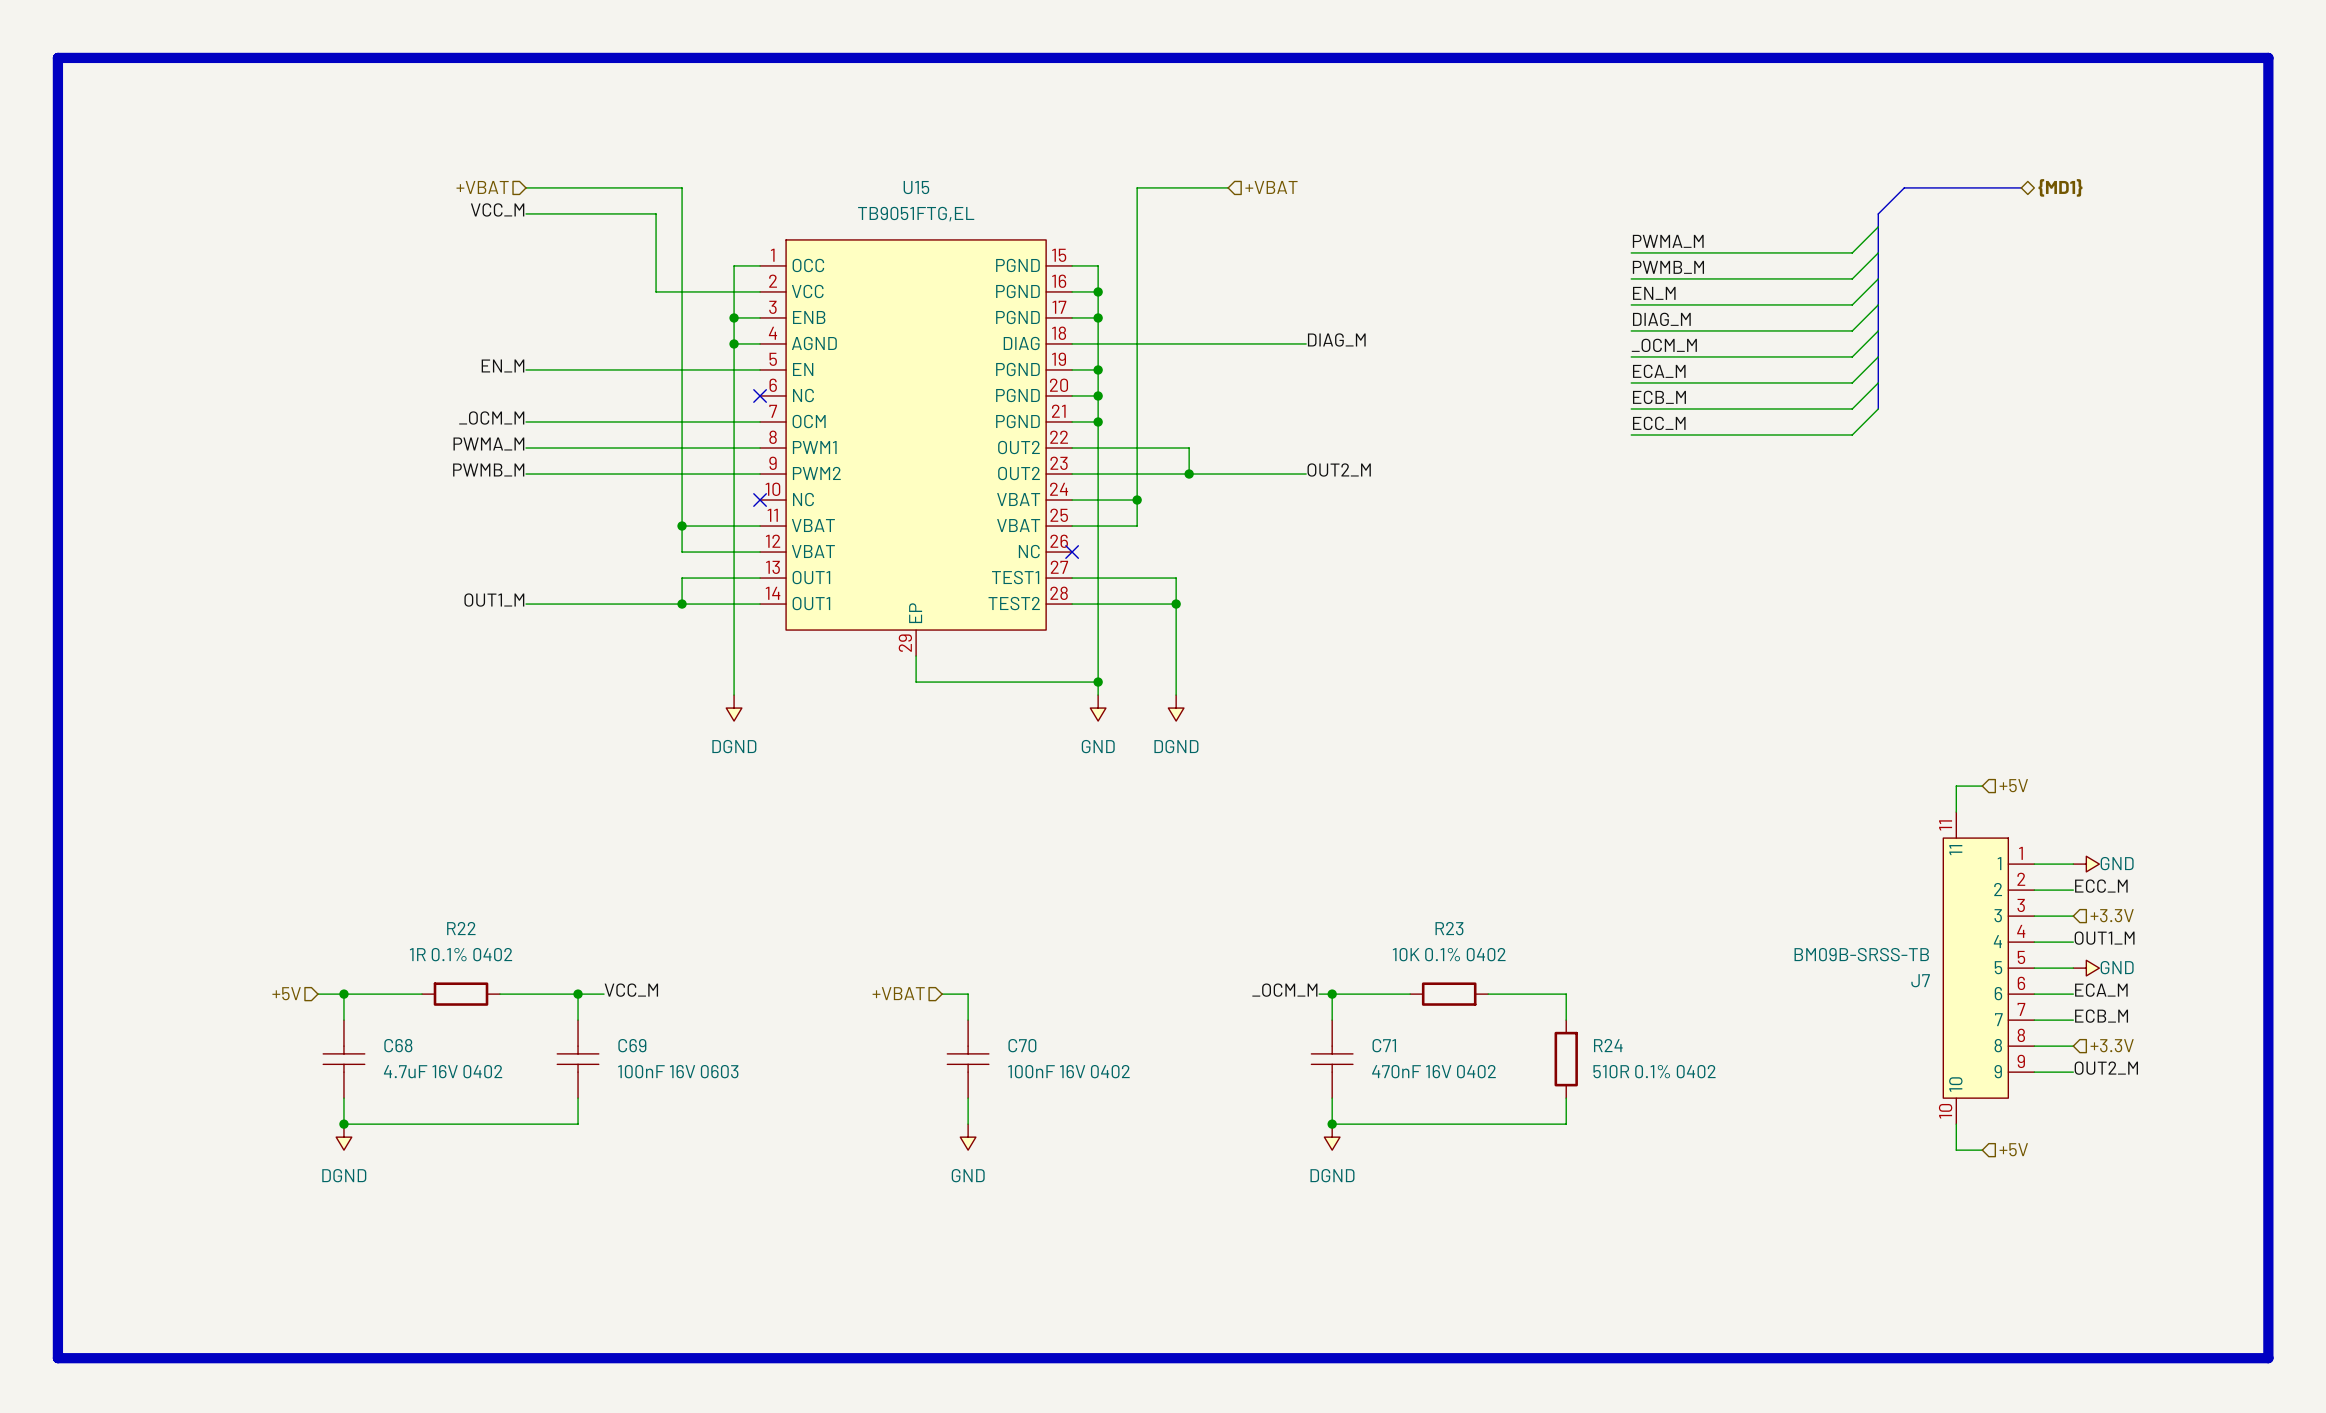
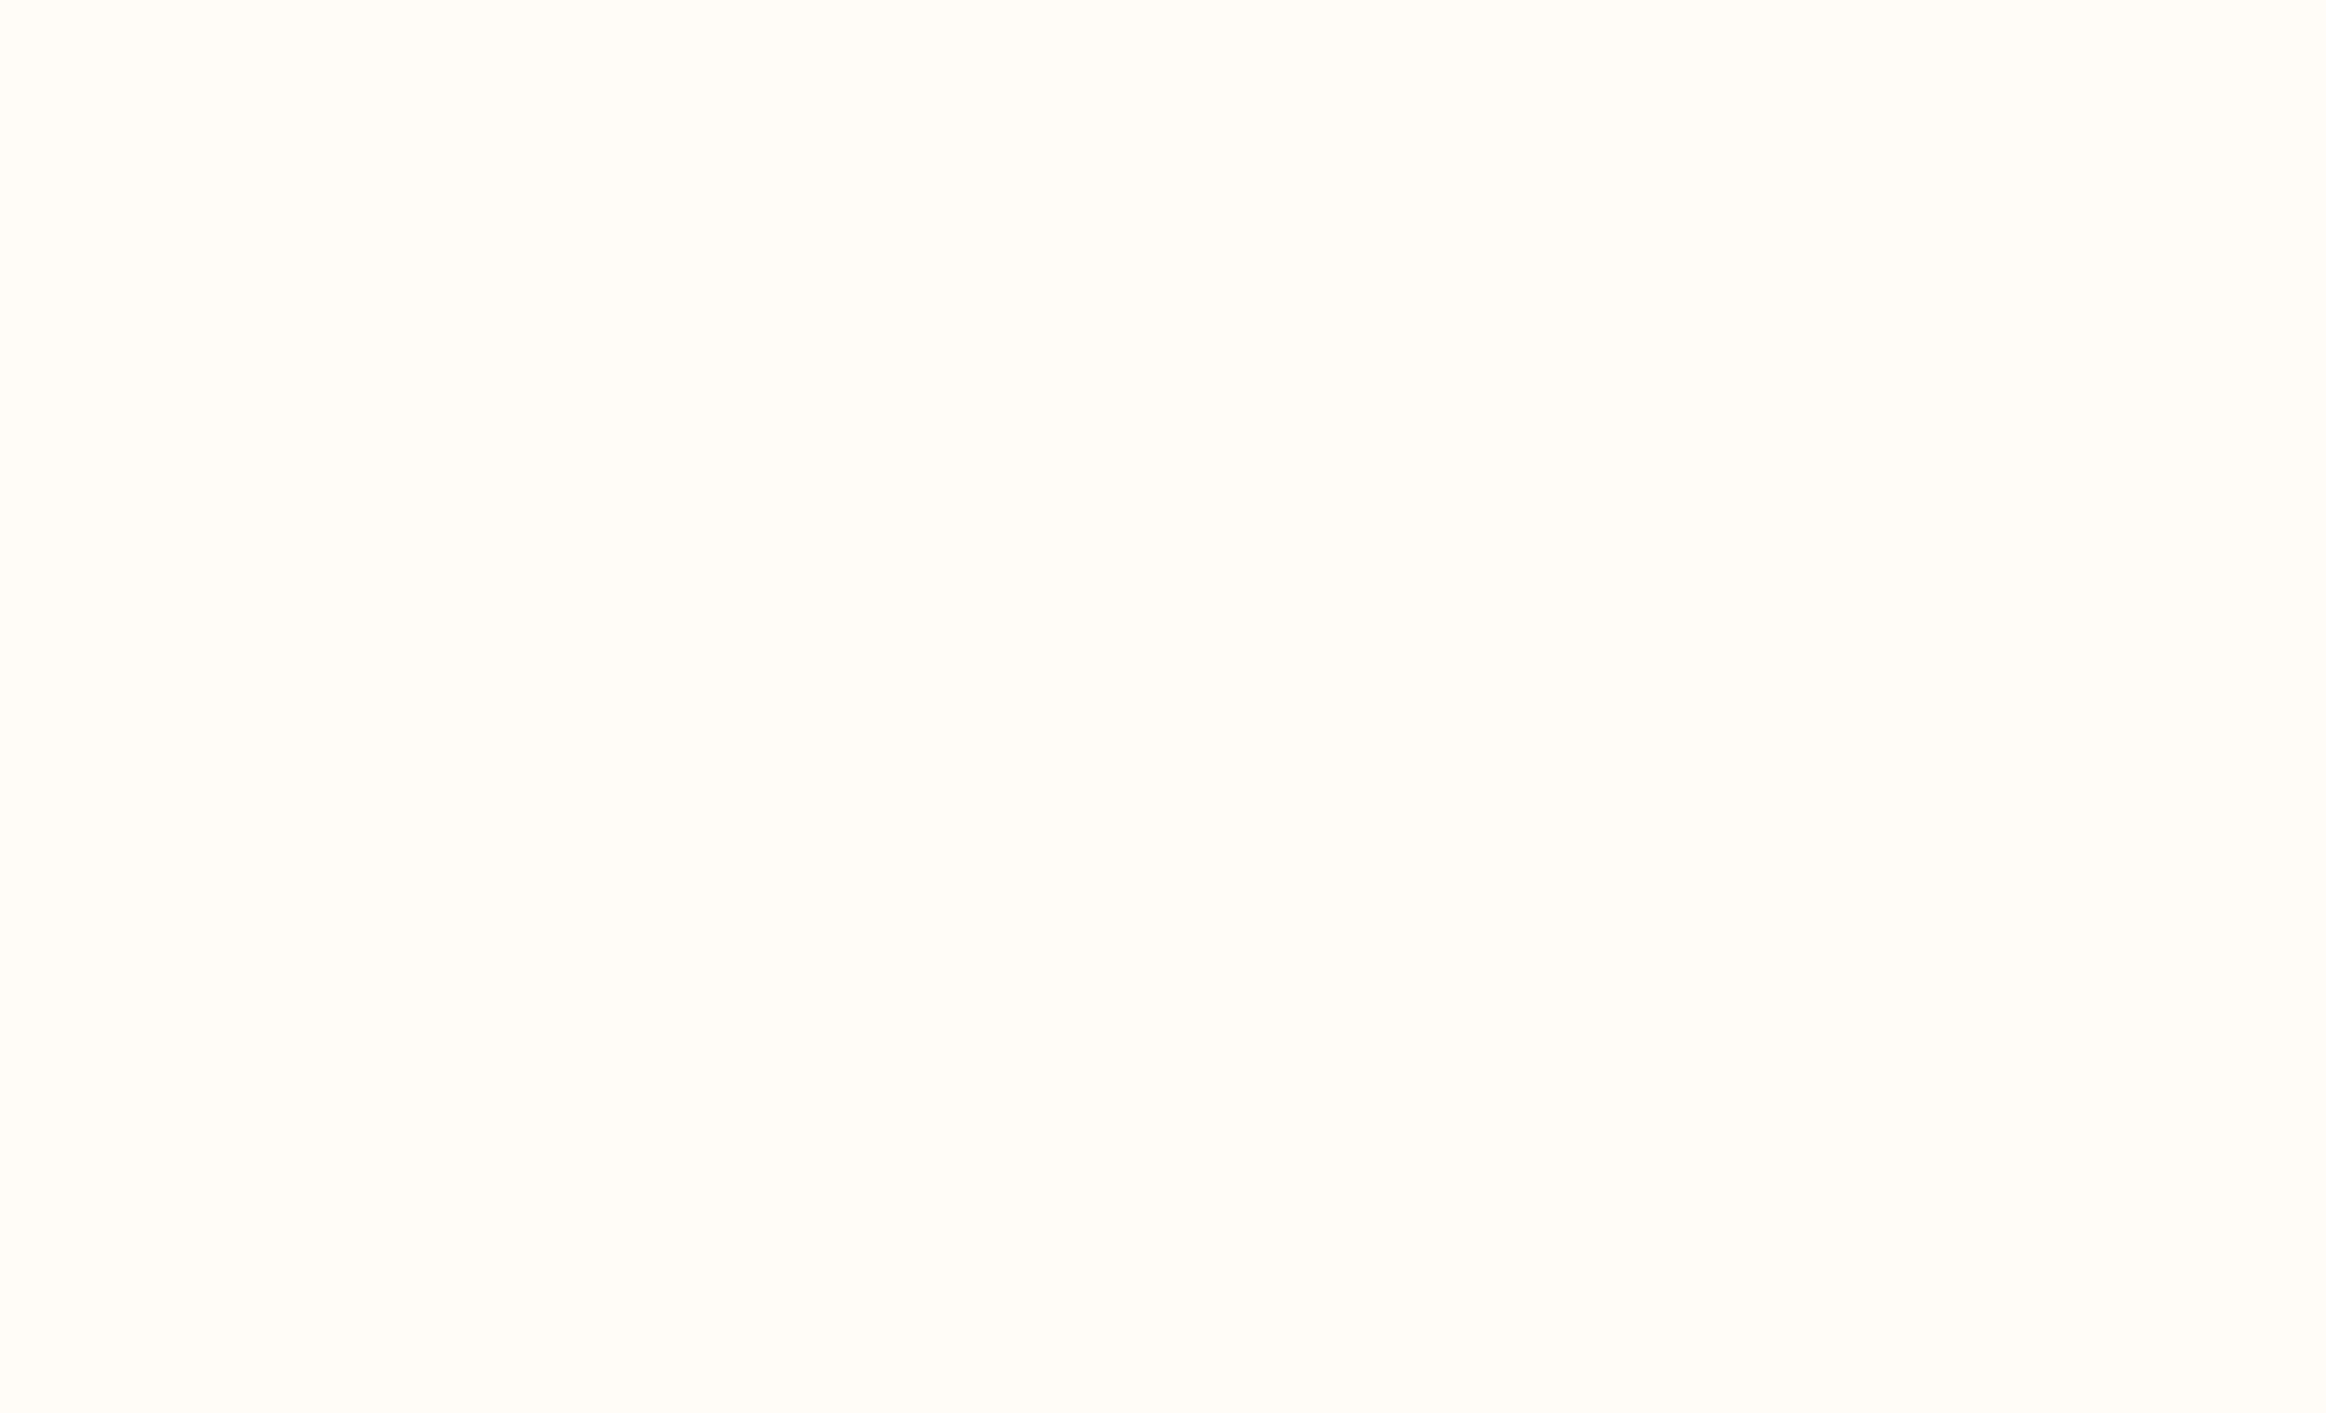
line: (57, 57) (2268, 57) (2268, 1358) (57, 1358) (57, 57) -> none
hierarchical label: +VBAT (482, 187) -> none
wire: (526, 187) (682, 187) (682, 552) (760, 552) -> none
wire: (1228, 187) (1137, 187) (1137, 526) (1072, 526) -> none
hierarchical label: +VBAT (1271, 187) -> none
bus: (2021, 187) (1904, 187) (1878, 213) (1878, 408) -> none
hierarchical label: {MD1} (2060, 187) -> none
label: VCC_M (497, 209) -> none
wire: (526, 213) (656, 213) (656, 291) (760, 291) -> none
wire: (1878, 226) (1852, 252) (1631, 252) -> none
label: PWMA_M (1668, 241) -> none
wire: (1878, 252) (1852, 278) (1631, 278) -> none
wire: (760, 265) (734, 265) (734, 695) -> none
wire: (1072, 265) (1098, 265) (1098, 695) -> none
label: PWMB_M (1668, 267) -> none
wire: (1878, 278) (1852, 304) (1631, 304) -> none
wire: (1072, 291) (1098, 291) -> none
junction: (1098, 291) -> none
label: EN_M (1654, 293) -> none
wire: (1878, 304) (1852, 330) (1631, 330) -> none
wire: (734, 317) (760, 317) -> none
junction: (734, 317) -> none
wire: (1072, 317) (1098, 317) -> none
junction: (1098, 317) -> none
label: DIAG_M (1661, 319) -> none
wire: (1878, 330) (1852, 356) (1631, 356) -> none
label: DIAG_M (1336, 339) -> none
wire: (734, 343) (760, 343) -> none
junction: (734, 343) -> none
wire: (1072, 343) (1306, 343) -> none
label: _OCM_M (1664, 345) -> none
wire: (1878, 356) (1852, 382) (1631, 382) -> none
label: EN_M (502, 365) -> none
wire: (526, 369) (760, 369) -> none
wire: (1072, 369) (1098, 369) -> none
junction: (1098, 369) -> none
label: ECA_M (1659, 371) -> none
wire: (1878, 382) (1852, 408) (1631, 408) -> none
no-connect mark: (760, 395) -> none
wire: (1072, 395) (1098, 395) -> none
junction: (1098, 395) -> none
label: ECB_M (1659, 397) -> none
wire: (1878, 408) (1852, 435) (1631, 435) -> none
label: _OCM_M (491, 418) -> none
wire: (526, 421) (760, 421) -> none
wire: (1072, 421) (1098, 421) -> none
junction: (1098, 421) -> none
label: ECC_M (1659, 423) -> none
label: PWMA_M (488, 443) -> none
wire: (526, 448) (760, 448) -> none
U15: TB9051FTG,EL (916, 448) -> none
wire: (1072, 448) (1189, 448) (1189, 474) -> none
label: PWMB_M (488, 470) -> none
label: OUT2_M (1339, 470) -> none
wire: (526, 474) (760, 474) -> none
wire: (1072, 474) (1306, 474) -> none
junction: (1189, 474) -> none
no-connect mark: (760, 500) -> none
wire: (1072, 500) (1137, 500) -> none
junction: (1137, 500) -> none
wire: (682, 526) (760, 526) -> none
junction: (682, 526) -> none
no-connect mark: (1072, 552) -> none
wire: (760, 578) (682, 578) (682, 604) -> none
wire: (1072, 578) (1176, 578) (1176, 695) -> none
label: OUT1_M (494, 600) -> none
wire: (526, 604) (760, 604) -> none
junction: (682, 604) -> none
wire: (1072, 604) (1176, 604) -> none
junction: (1176, 604) -> none
wire: (916, 656) (916, 682) (1098, 682) -> none
junction: (1098, 682) -> none
power symbol: DGND (734, 708) -> none
power symbol: GND (1098, 708) -> none
power symbol: DGND (1176, 708) -> none
hierarchical label: +5V (2013, 785) -> none
wire: (1982, 786) (1956, 786) (1956, 812) -> none
wire: (2034, 864) (2073, 864) -> none
power symbol: GND (2086, 864) -> none
label: ECC_M (2101, 886) -> none
wire: (2034, 890) (2073, 890) -> none
hierarchical label: +3.3V (2112, 915) -> none
wire: (2034, 916) (2073, 916) -> none
label: OUT1_M (2104, 938) -> none
wire: (2034, 942) (2073, 942) -> none
J7: BM09B-SRSS-TB (1988, 968) -> none
wire: (2034, 968) (2073, 968) -> none
power symbol: GND (2086, 968) -> none
label: VCC_M (631, 990) -> none
label: _OCM_M (1284, 990) -> none
label: ECA_M (2101, 990) -> none
hierarchical label: +5V (286, 993) -> none
hierarchical label: +VBAT (898, 993) -> none
wire: (317, 994) (421, 994) -> none
wire: (343, 994) (343, 1020) -> none
junction: (343, 994) -> none
R22: 1R 0.1% 0402 (461, 994) -> none
wire: (500, 994) (604, 994) -> none
wire: (578, 994) (578, 1020) -> none
junction: (578, 994) -> none
wire: (942, 994) (968, 994) (968, 1020) -> none
wire: (1319, 994) (1410, 994) -> none
wire: (1332, 994) (1332, 1020) -> none
junction: (1332, 994) -> none
R23: 10K 0.1% 0402 (1449, 994) -> none
wire: (1488, 994) (1566, 994) (1566, 1020) -> none
wire: (2034, 994) (2073, 994) -> none
label: ECB_M (2101, 1016) -> none
wire: (2034, 1020) (2073, 1020) -> none
hierarchical label: +3.3V (2112, 1045) -> none
wire: (2034, 1046) (2073, 1046) -> none
C68: 4.7uF 16V 0402 (343, 1059) -> none
C69: 100nF 16V 0603 (578, 1059) -> none
C70: 100nF 16V 0402 (968, 1059) -> none
C71: 470nF 16V 0402 (1332, 1059) -> none
R24: 510R 0.1% 0402 (1566, 1059) -> none
label: OUT2_M (2106, 1068) -> none
wire: (2034, 1072) (2073, 1072) -> none
wire: (343, 1098) (343, 1124) (578, 1124) (578, 1098) -> none
wire: (968, 1098) (968, 1124) -> none
wire: (1332, 1098) (1332, 1124) (1566, 1124) (1566, 1098) -> none
junction: (343, 1124) -> none
junction: (1332, 1124) -> none
wire: (1956, 1124) (1956, 1150) (1982, 1150) -> none
power symbol: DGND (343, 1137) -> none
power symbol: GND (968, 1137) -> none
power symbol: DGND (1332, 1137) -> none
hierarchical label: +5V (2013, 1149) -> none

